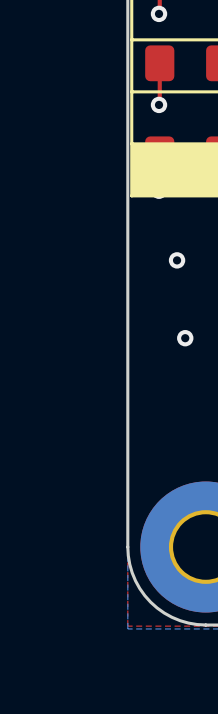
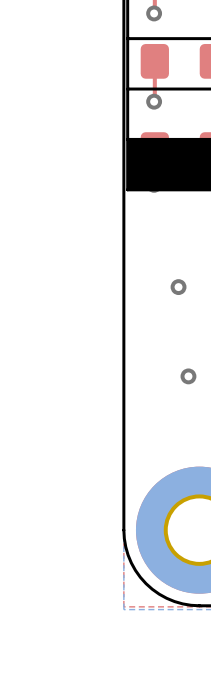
via: (177, 260) -> none
via: none -> (178, 287)
via: (185, 338) -> none
via: none -> (188, 376)

